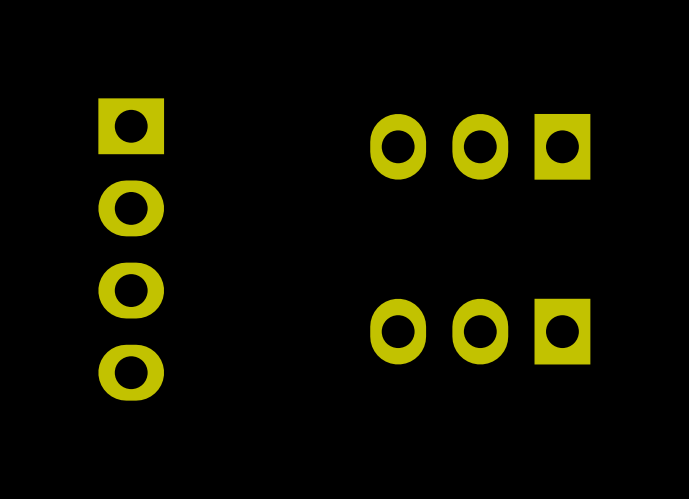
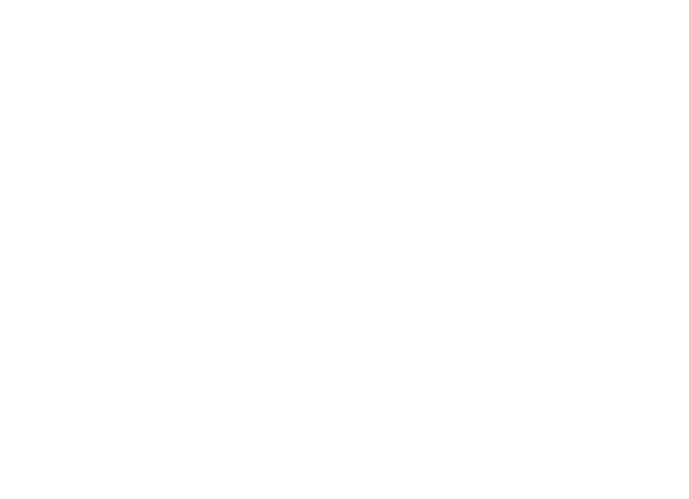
part: (480, 146) -> none
part: (131, 249) -> none
part: (480, 331) -> none

